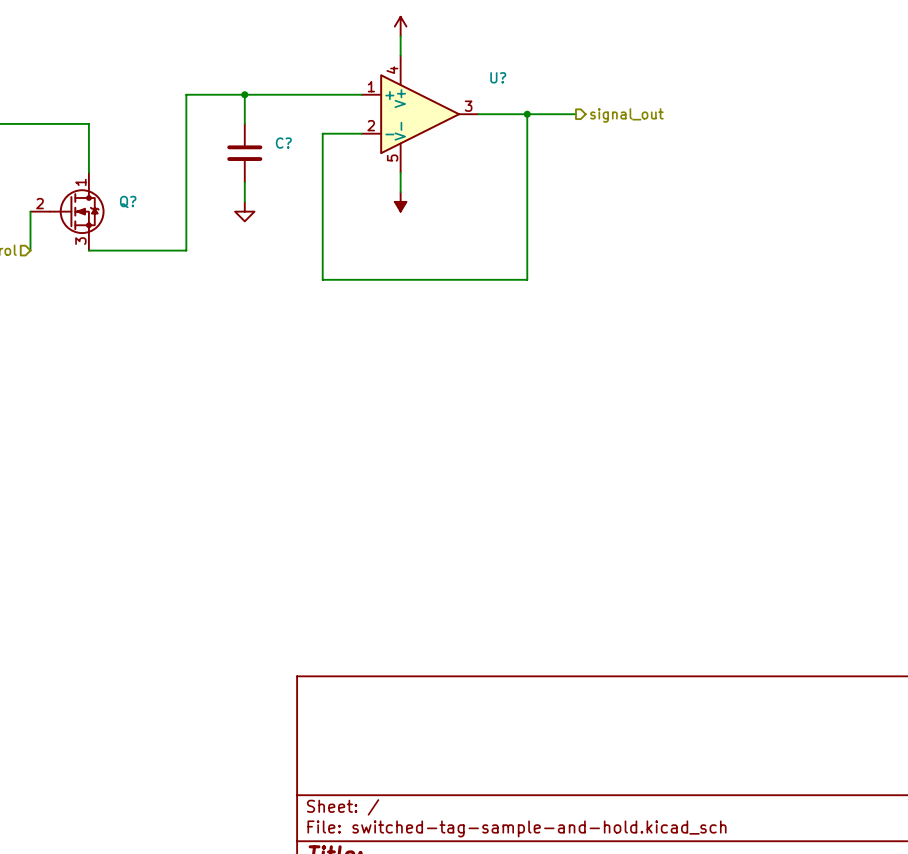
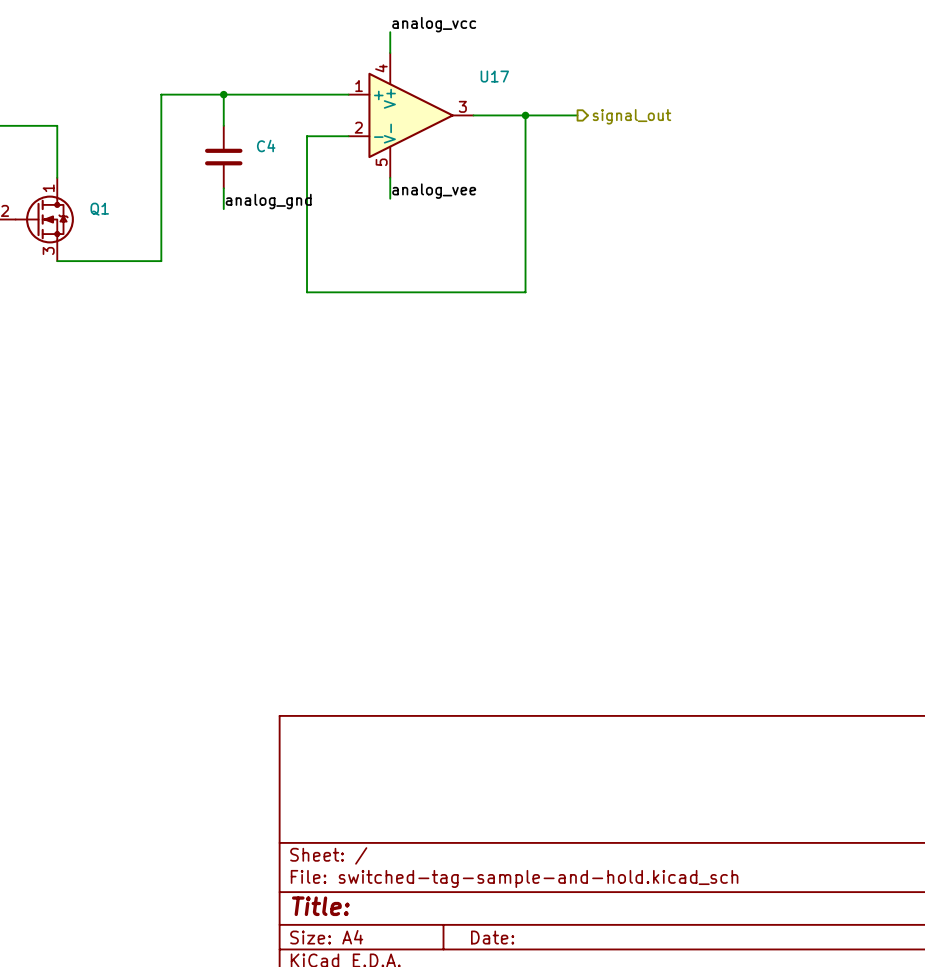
power symbol: (400, 26) -> none
label: none -> analog_vcc (434, 24)
U? name: U? (498, 77) -> U17 (494, 76)
C? name: C? (283, 143) -> C4 (266, 146)
label: none -> analog_vee (434, 191)
label: none -> analog_gnd (268, 201)
Q? name: Q? (128, 201) -> Q1 (99, 209)
power symbol: (400, 201) -> none
power symbol: (244, 211) -> none

